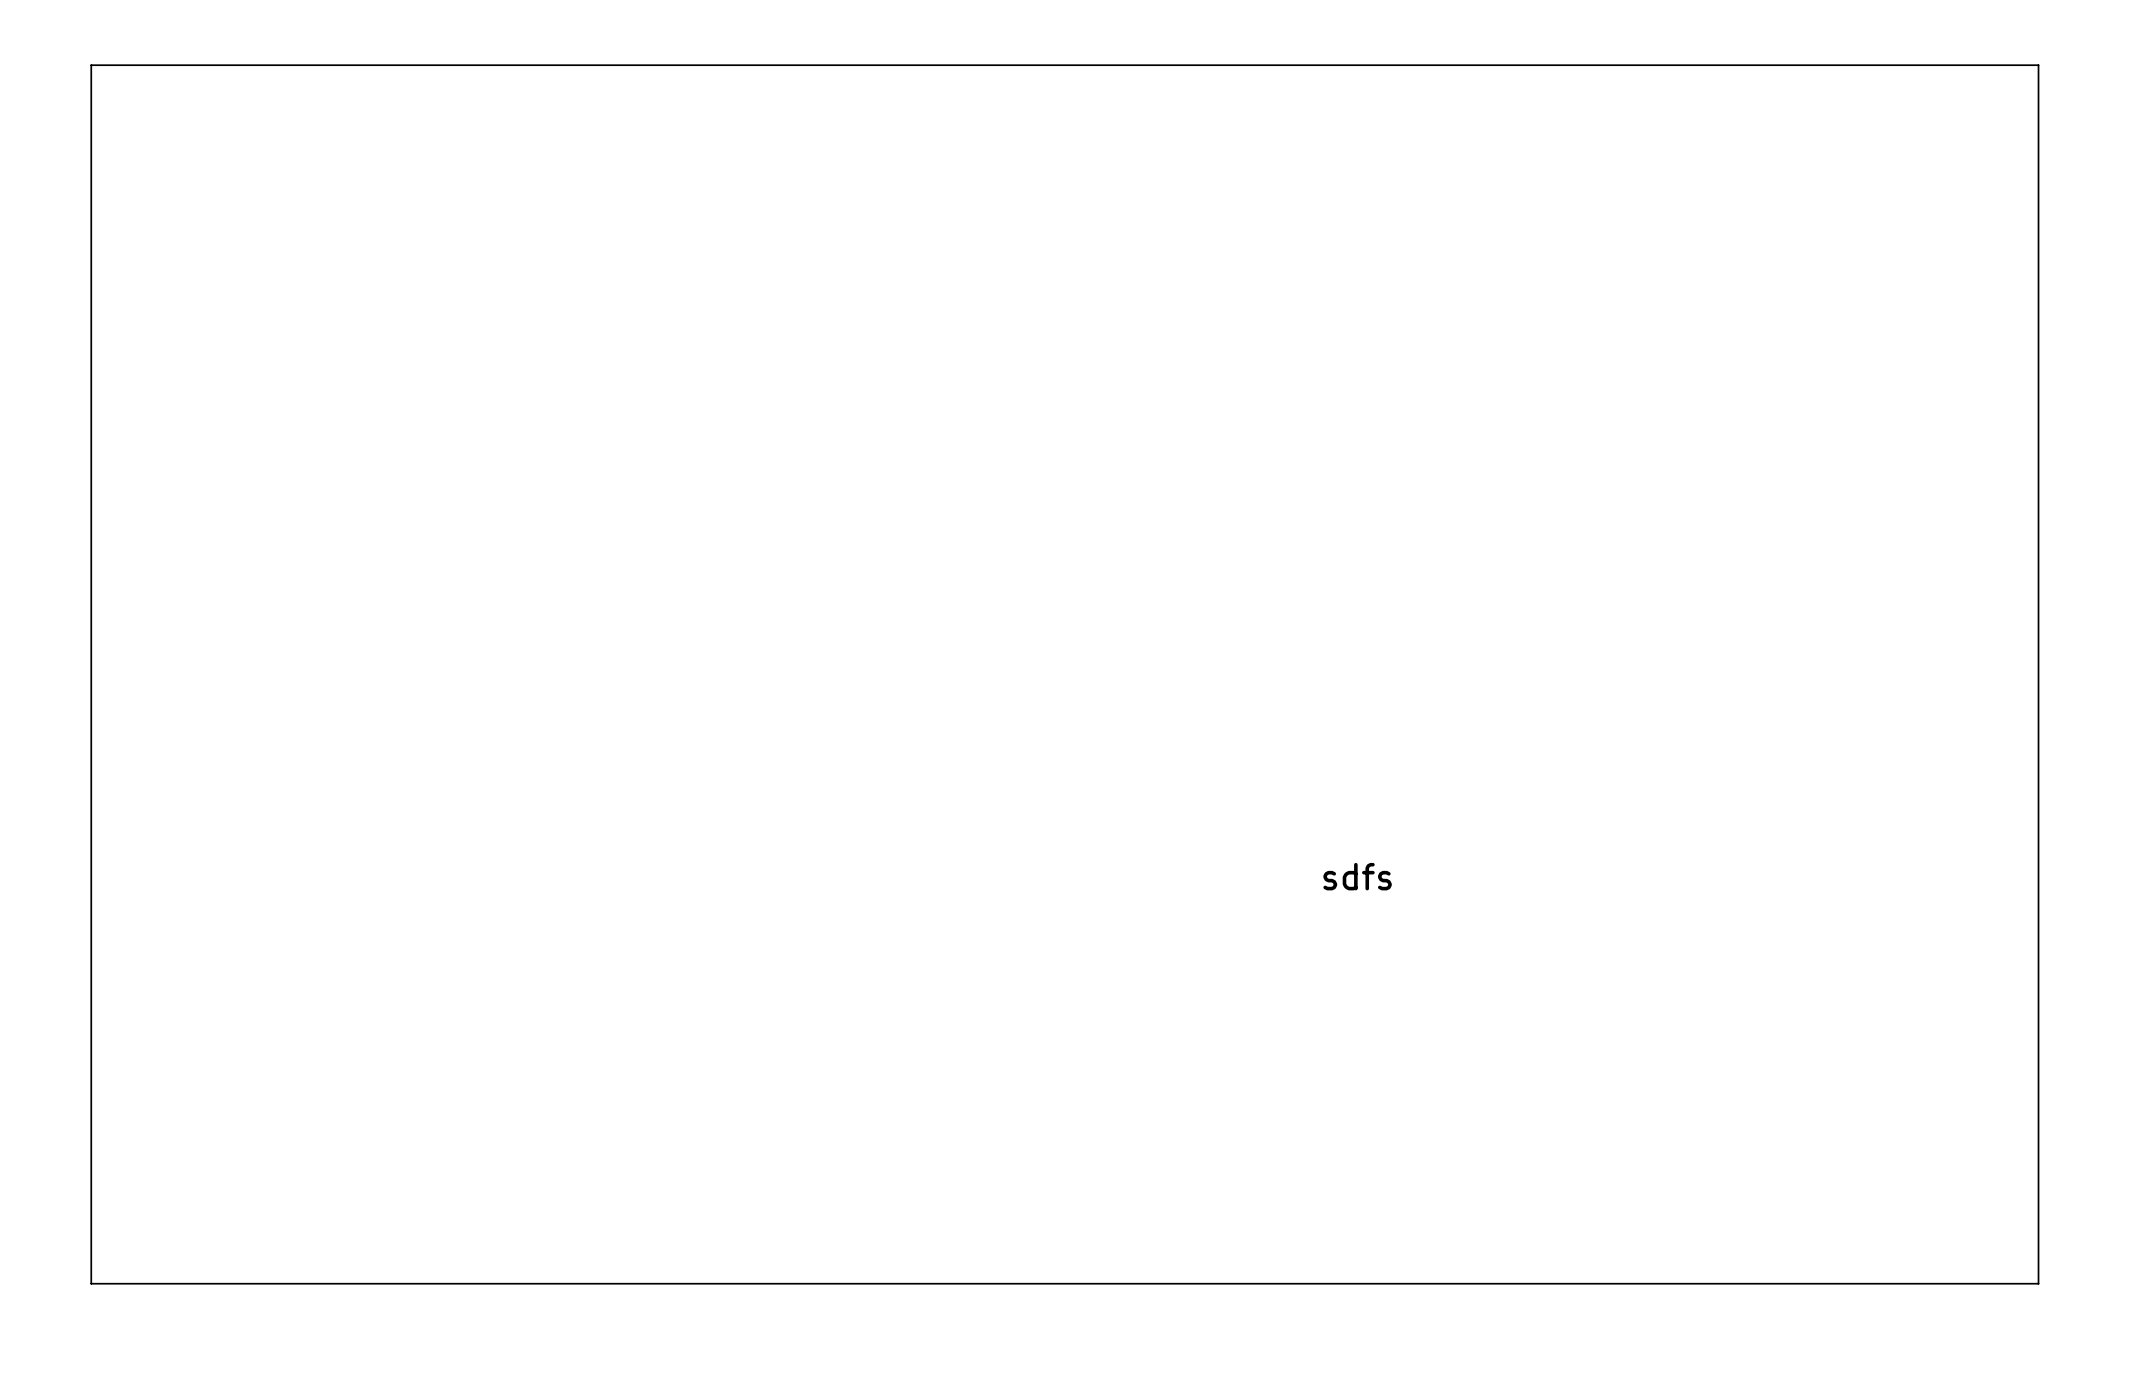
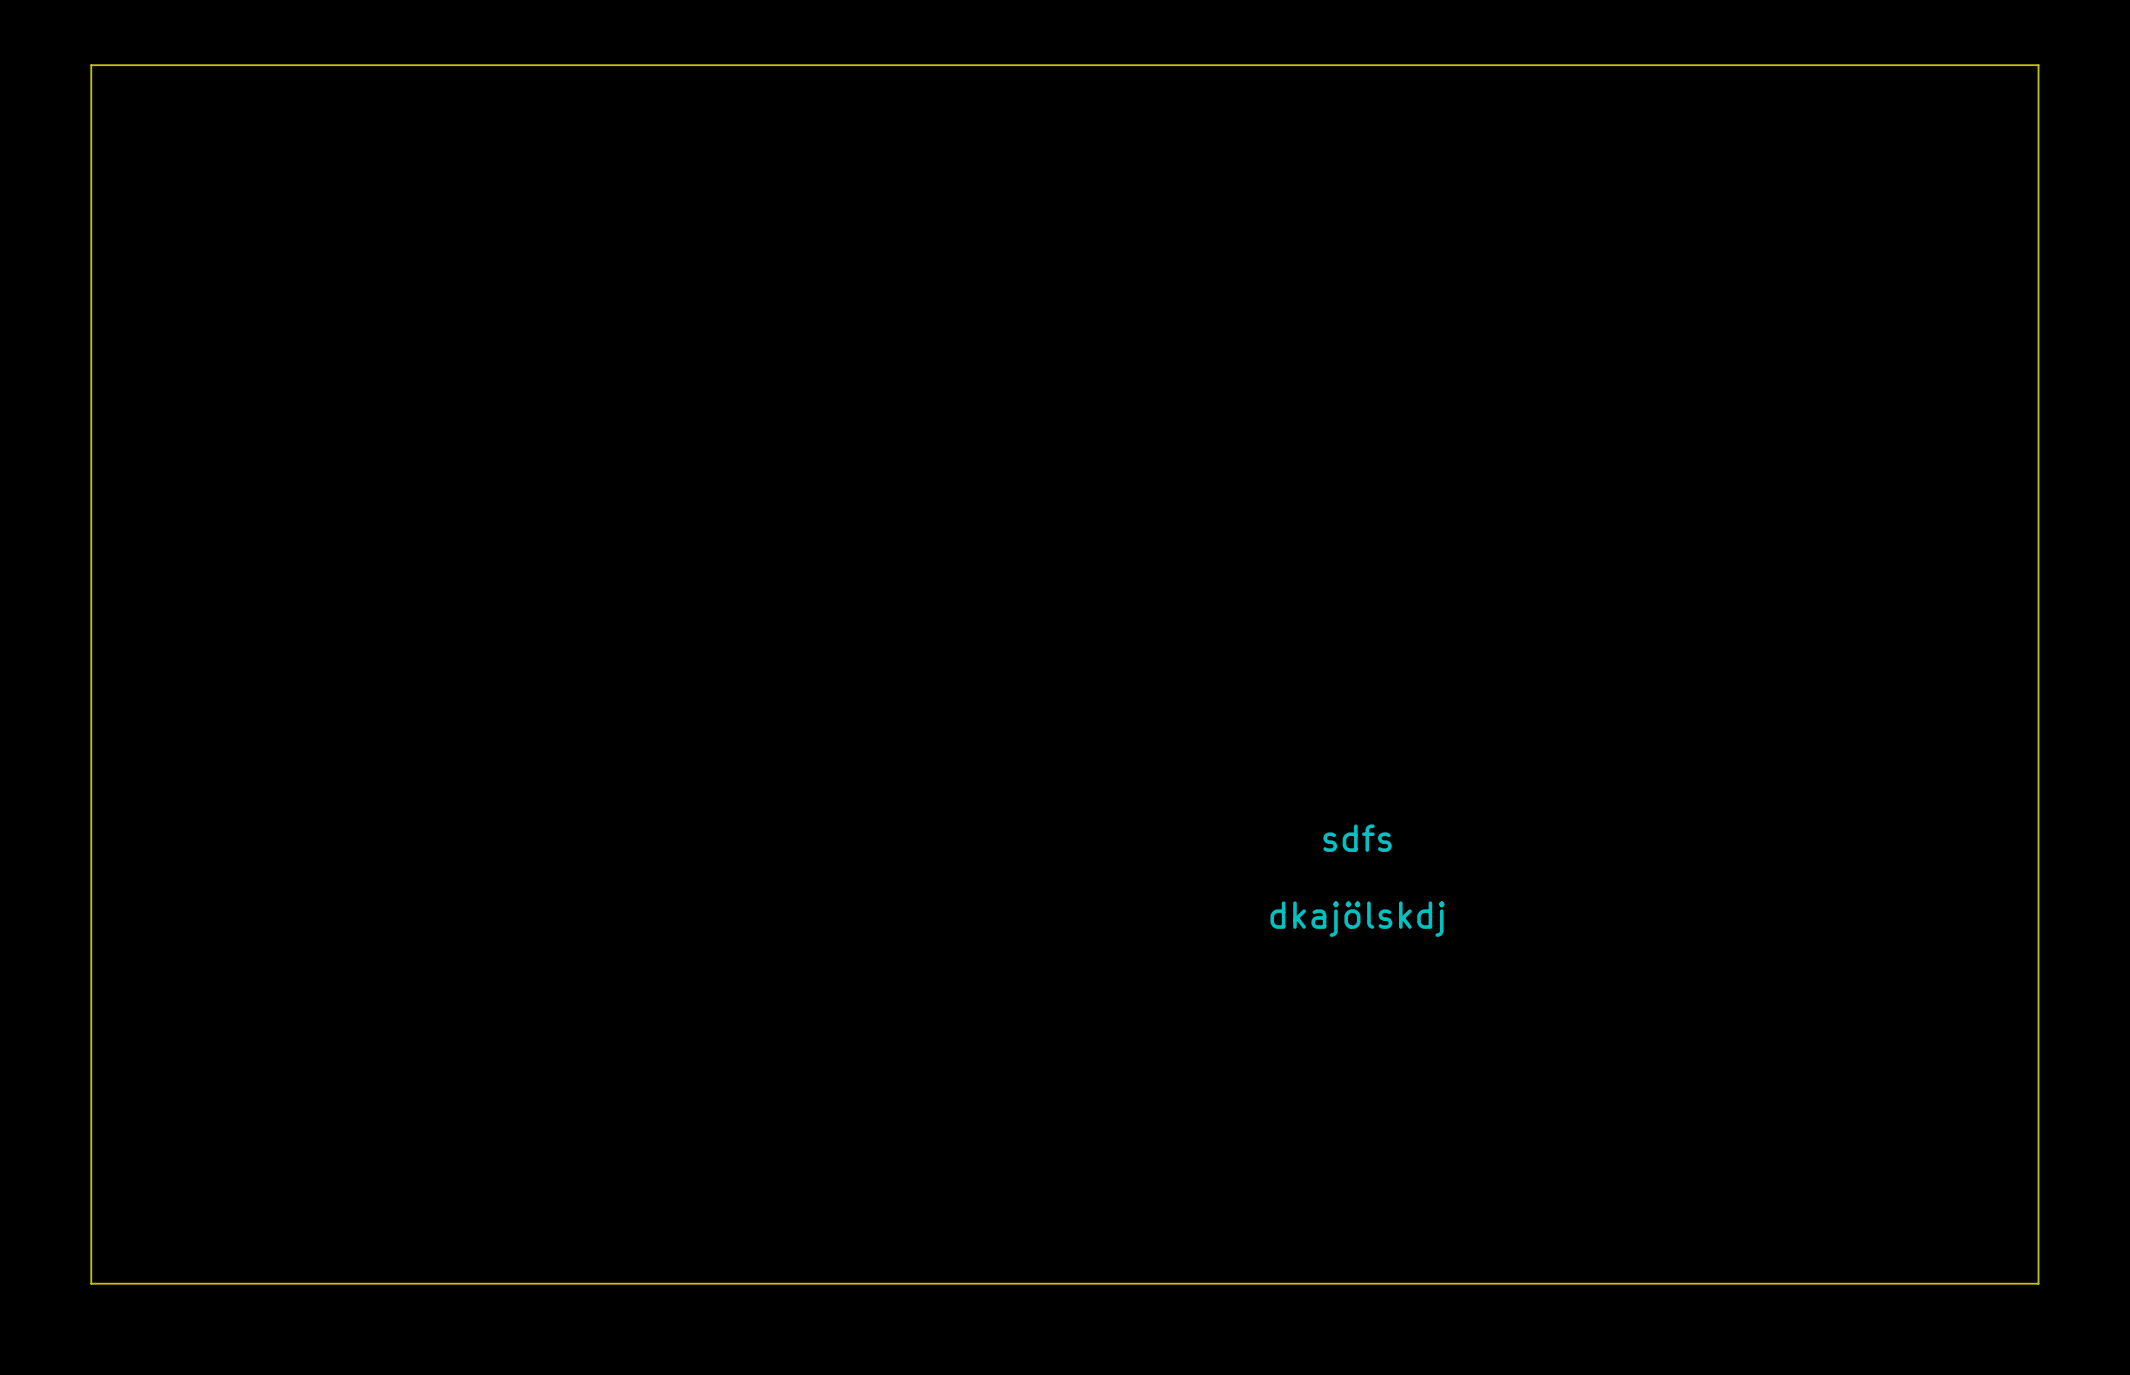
text position: sdfs (1357, 876) -> sdfs (1357, 838)
text: none -> dkajölskdj (1357, 919)

